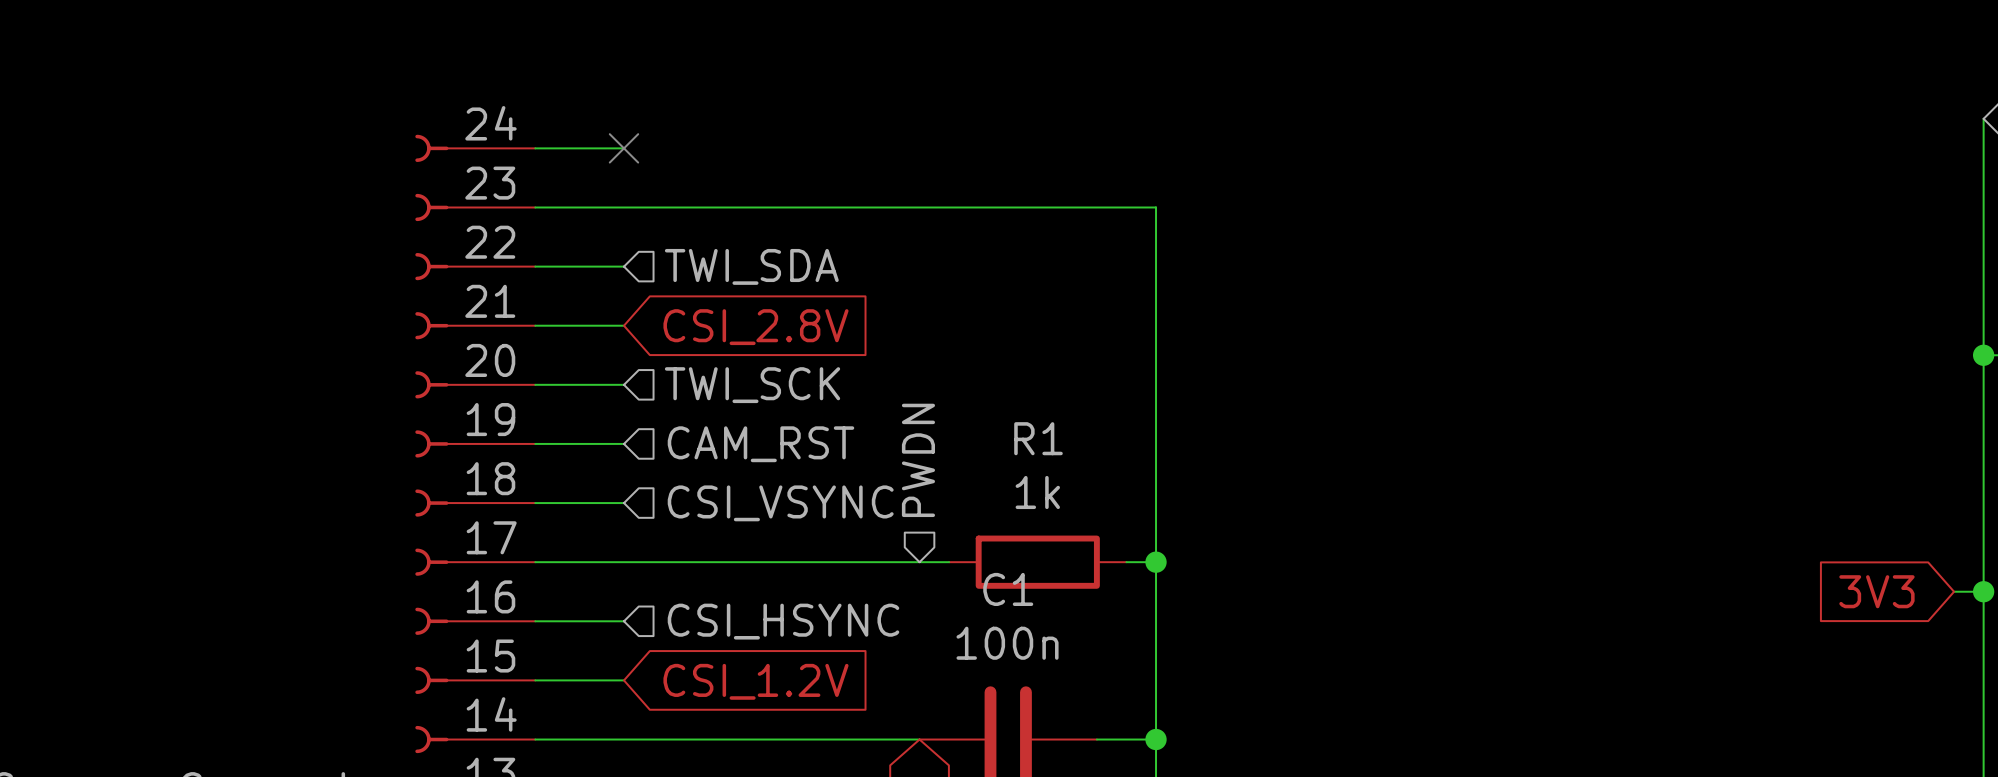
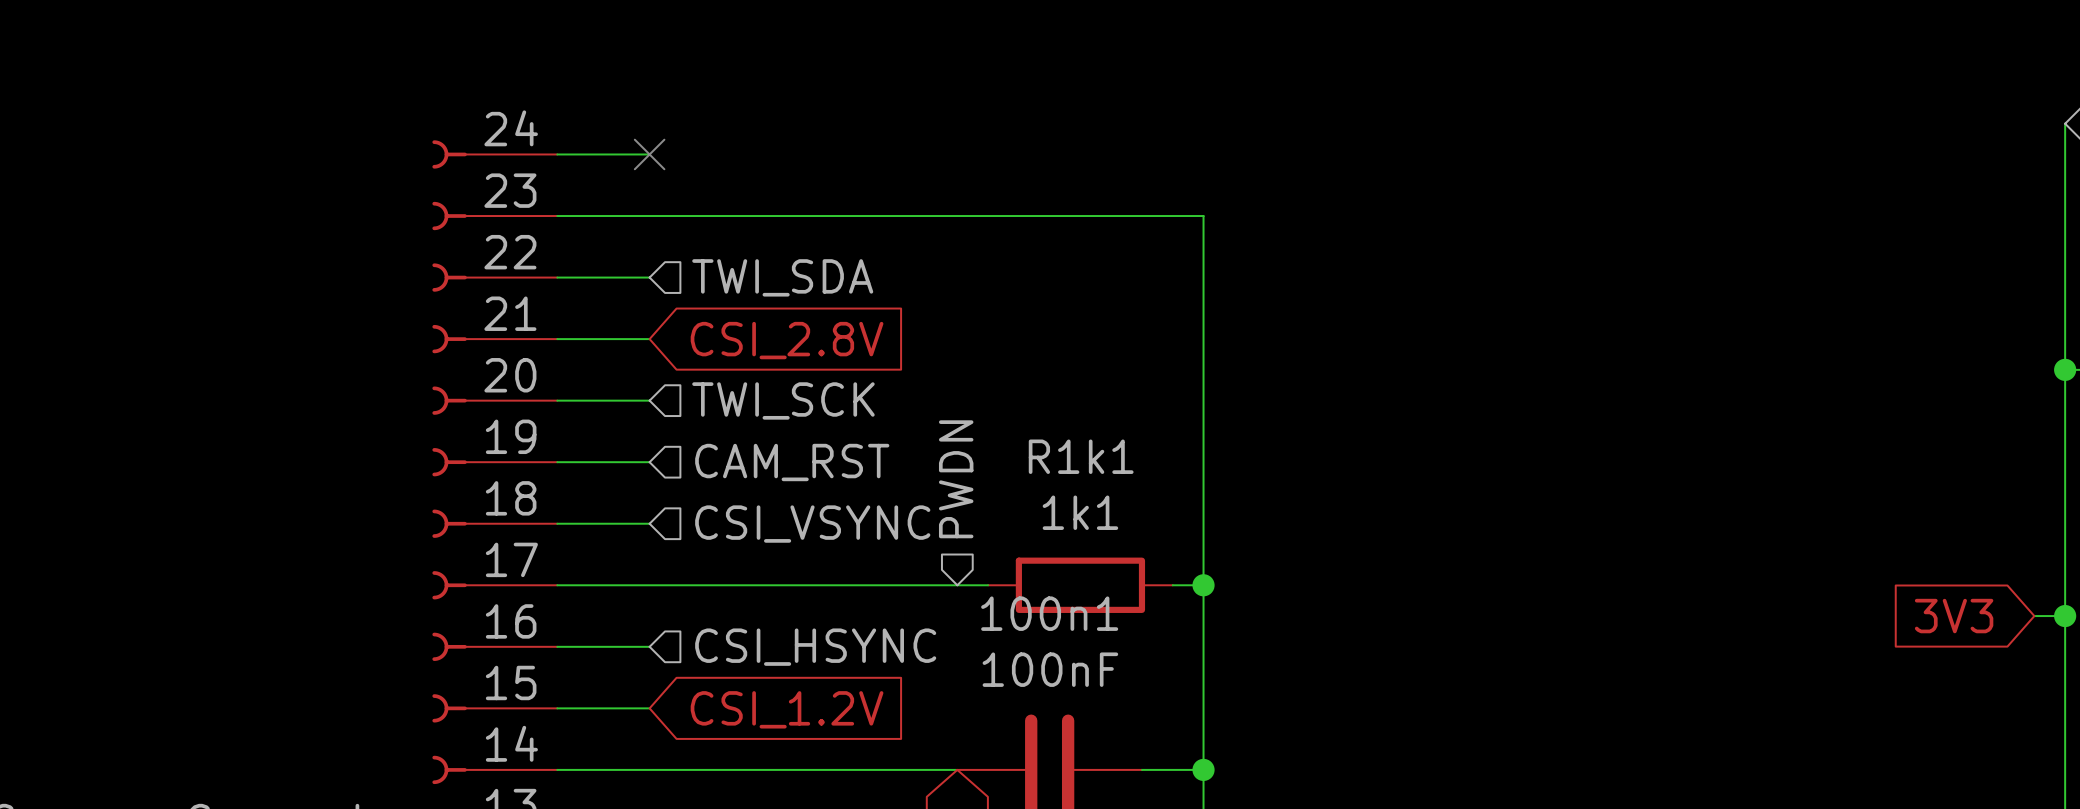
R1 name: R1 (1038, 438) -> R1k1 (1081, 456)
R1 value: 1k (1037, 492) -> 1k1 (1080, 512)
C1 name: C1 (1008, 589) -> 100n1 (1049, 613)
C1 value: 100n (1007, 643) -> 100nF (1050, 669)

